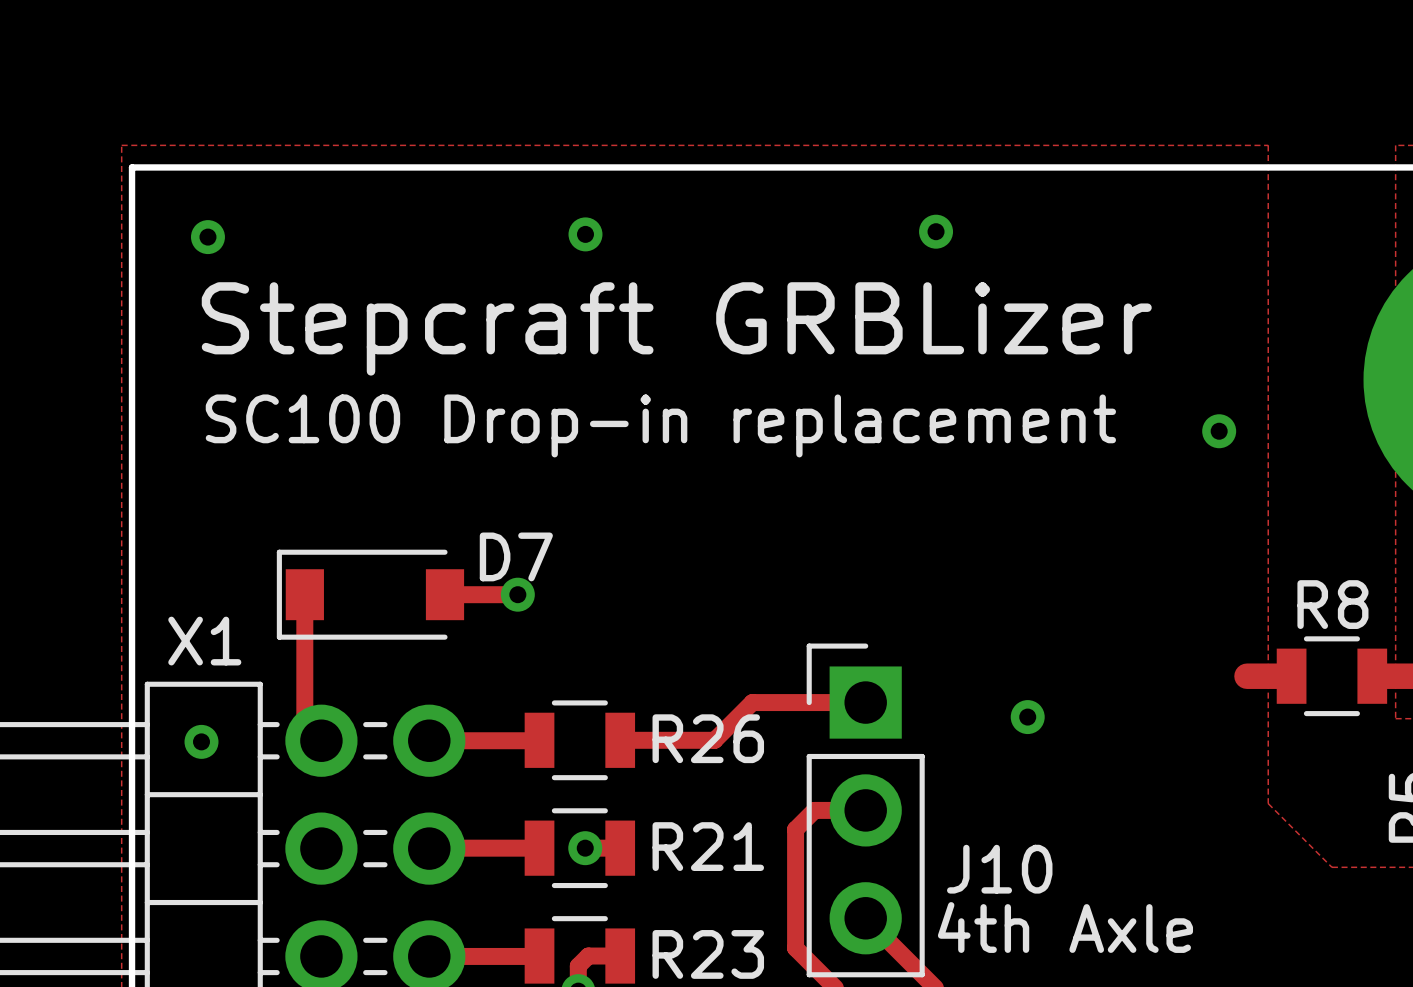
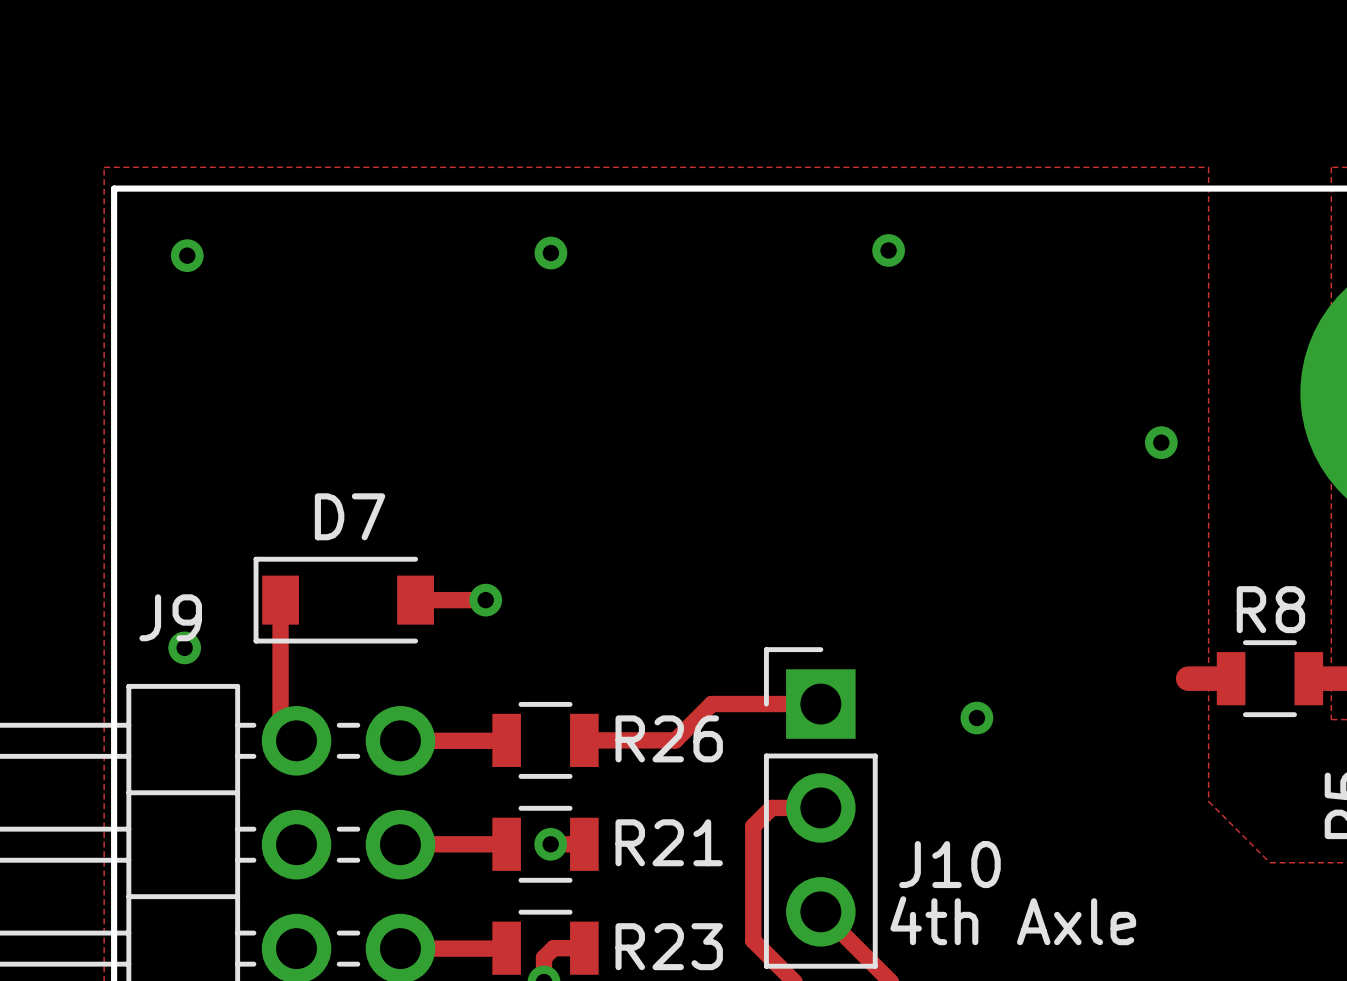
text: Stepcraft GRBLizer (676, 328) -> none
text: SC100 Drop-in replacement (660, 425) -> none
D7 name position: D7 (516, 556) -> D7 (350, 516)
J9 name: none -> J9 (170, 617)
J9 value: X1 (204, 641) -> none
via position: (201, 741) -> (184, 647)

